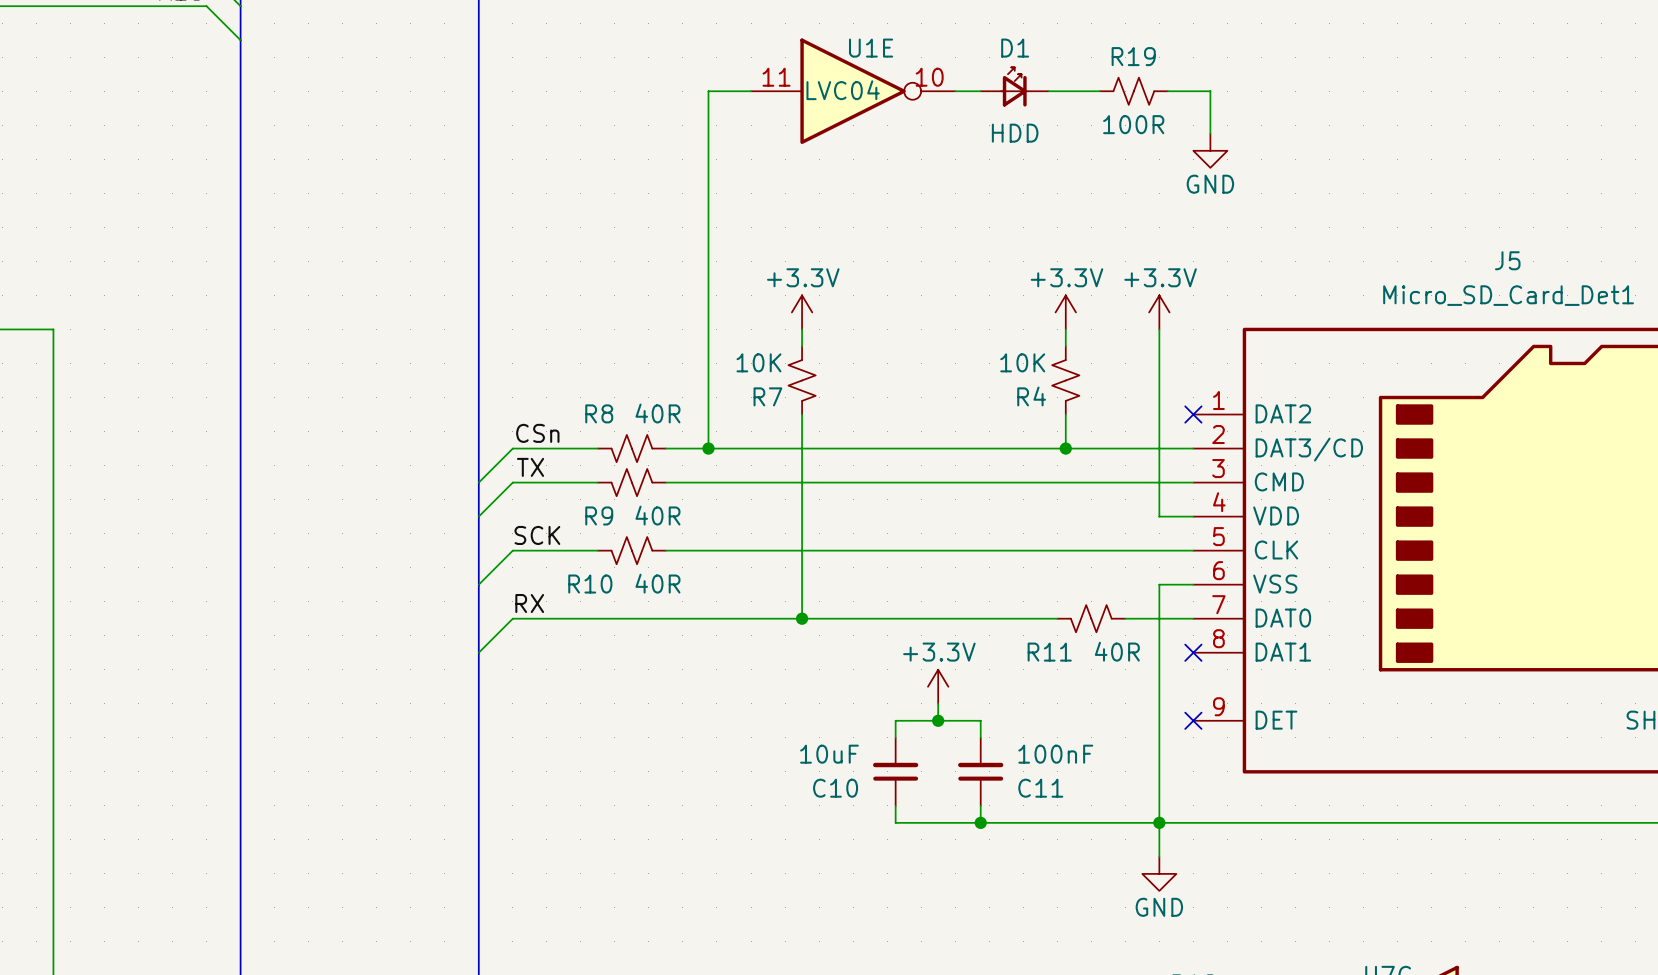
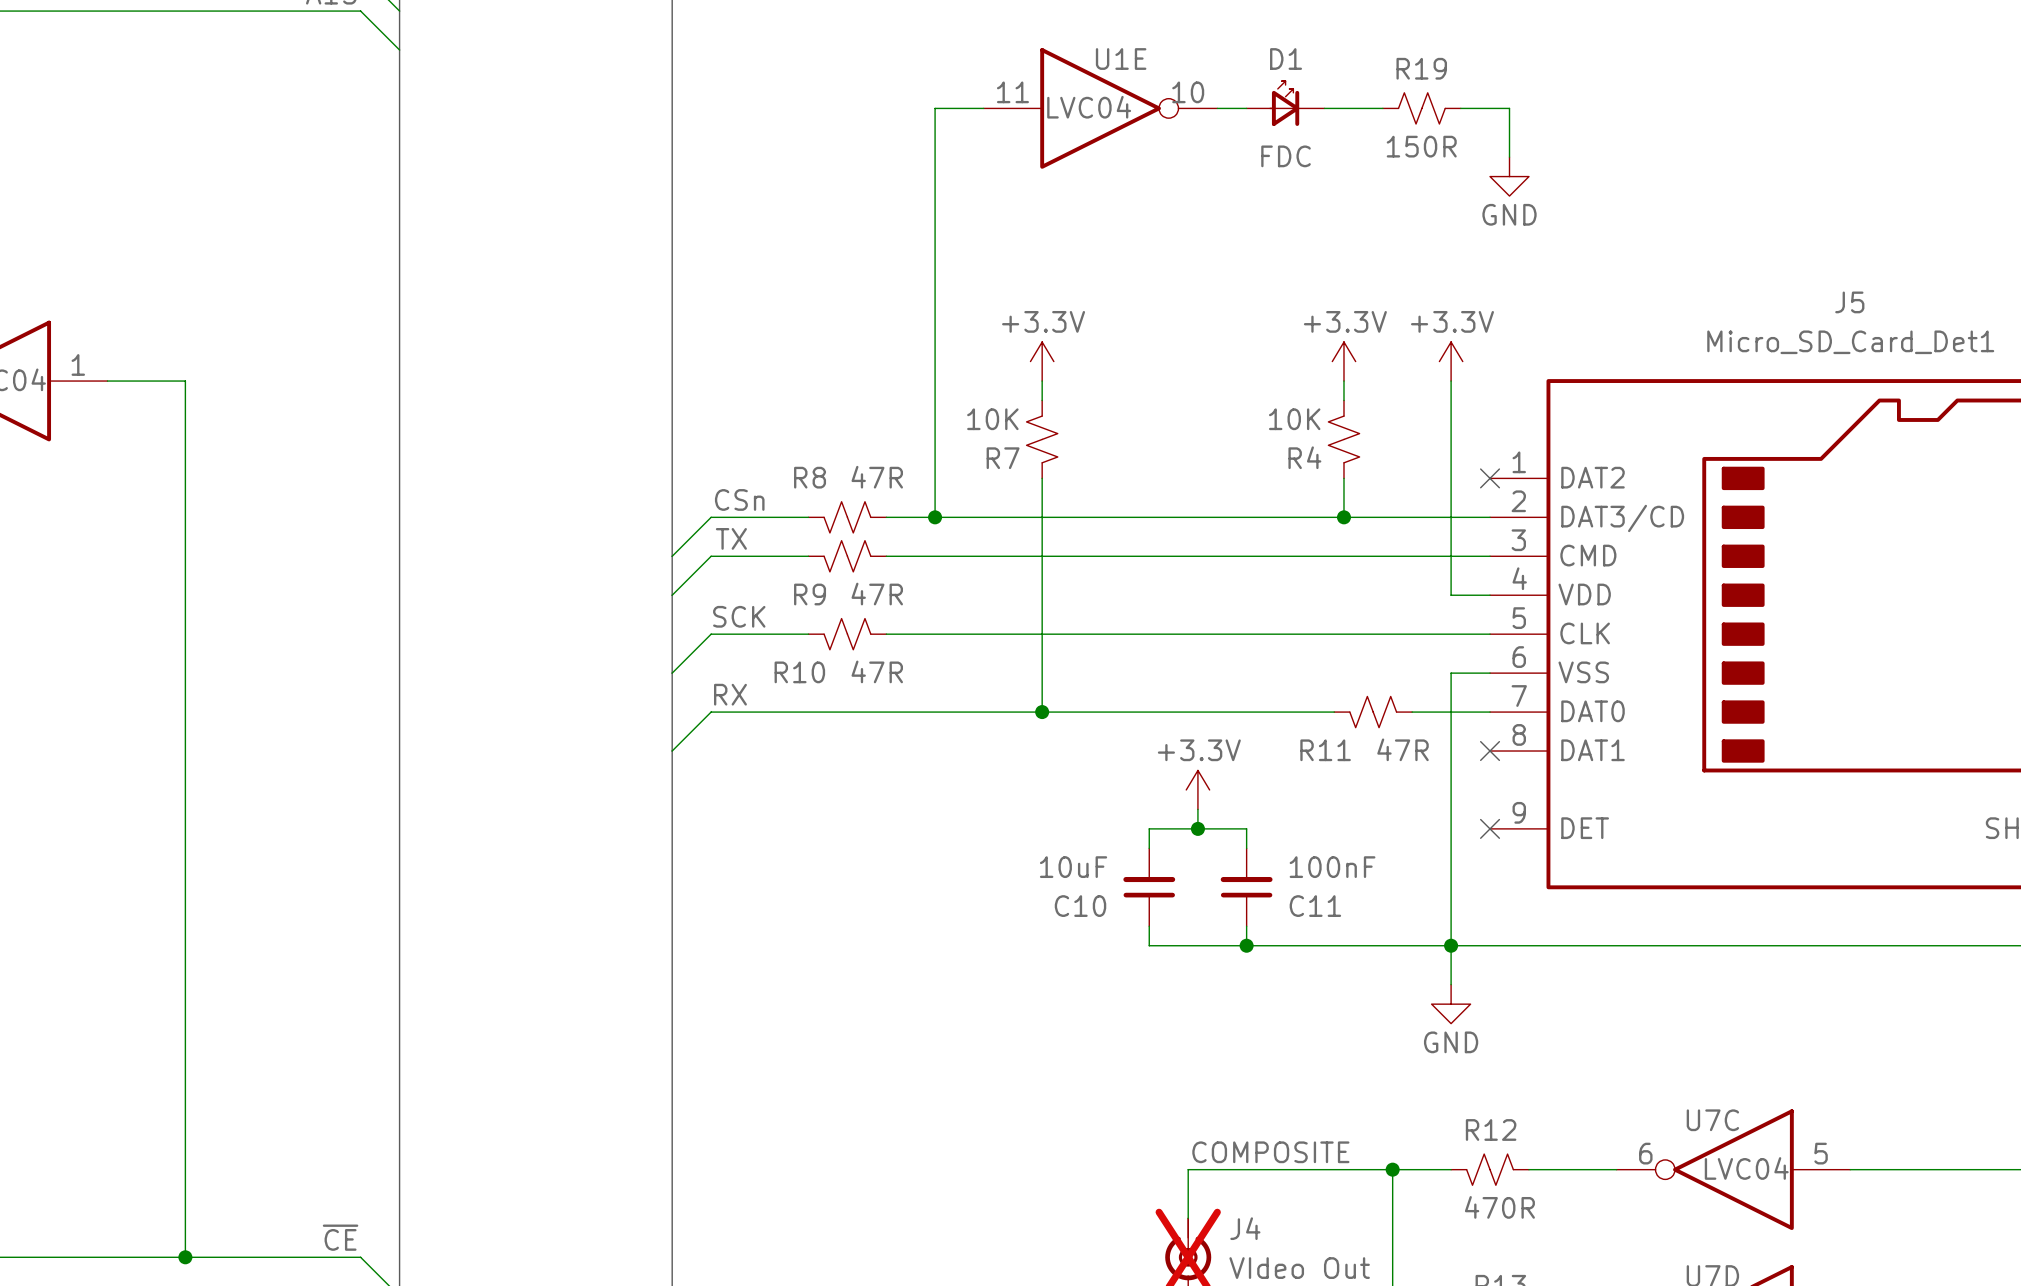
R19 value: 100R (1133, 124) -> 150R (1421, 146)
D1 value: HDD (1015, 133) -> FDC (1286, 156)
R8 value: 40R (657, 413) -> 47R (877, 477)
R9 value: 40R (657, 515) -> 47R (877, 594)
R10 value: 40R (657, 583) -> 47R (877, 671)
R11 value: 40R (1117, 651) -> 47R (1403, 749)

